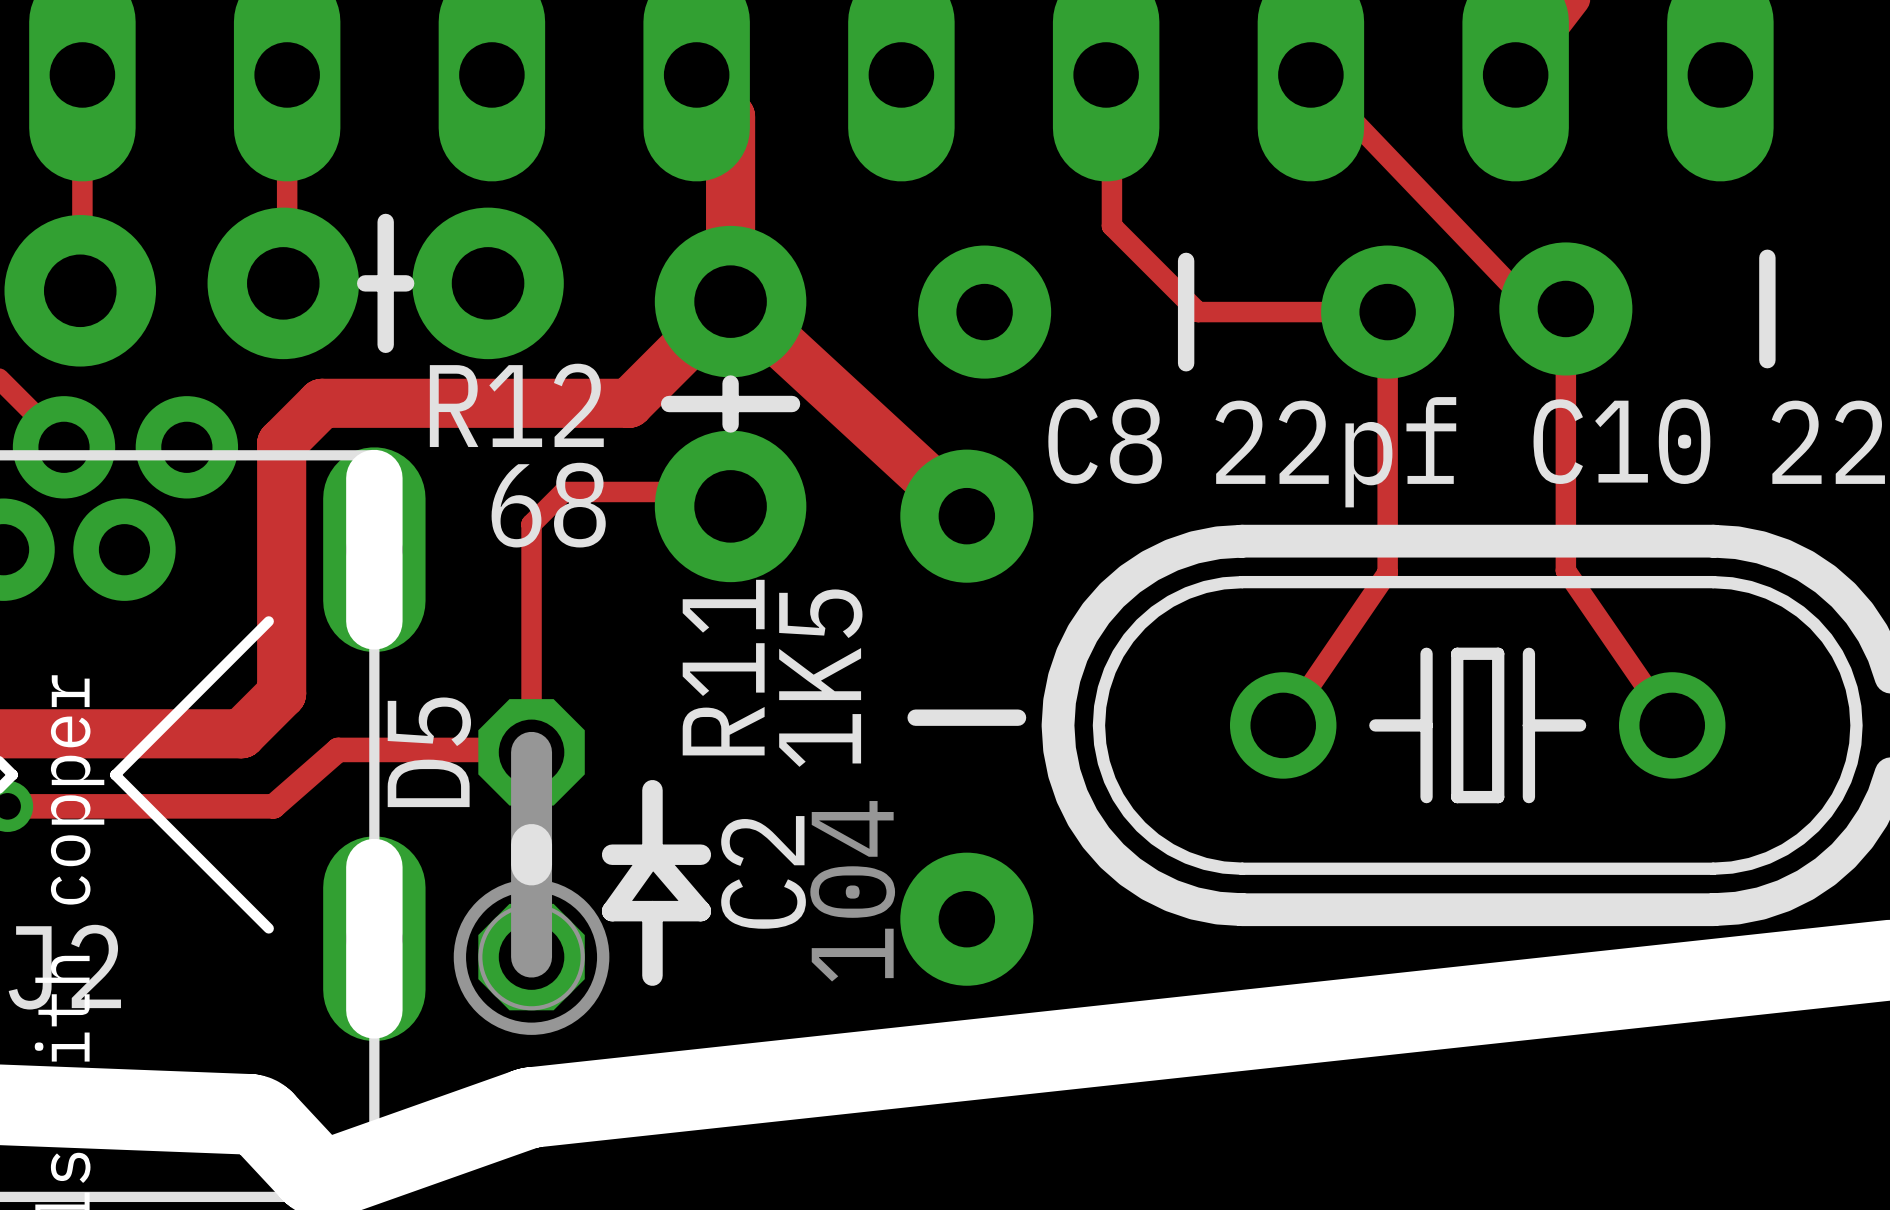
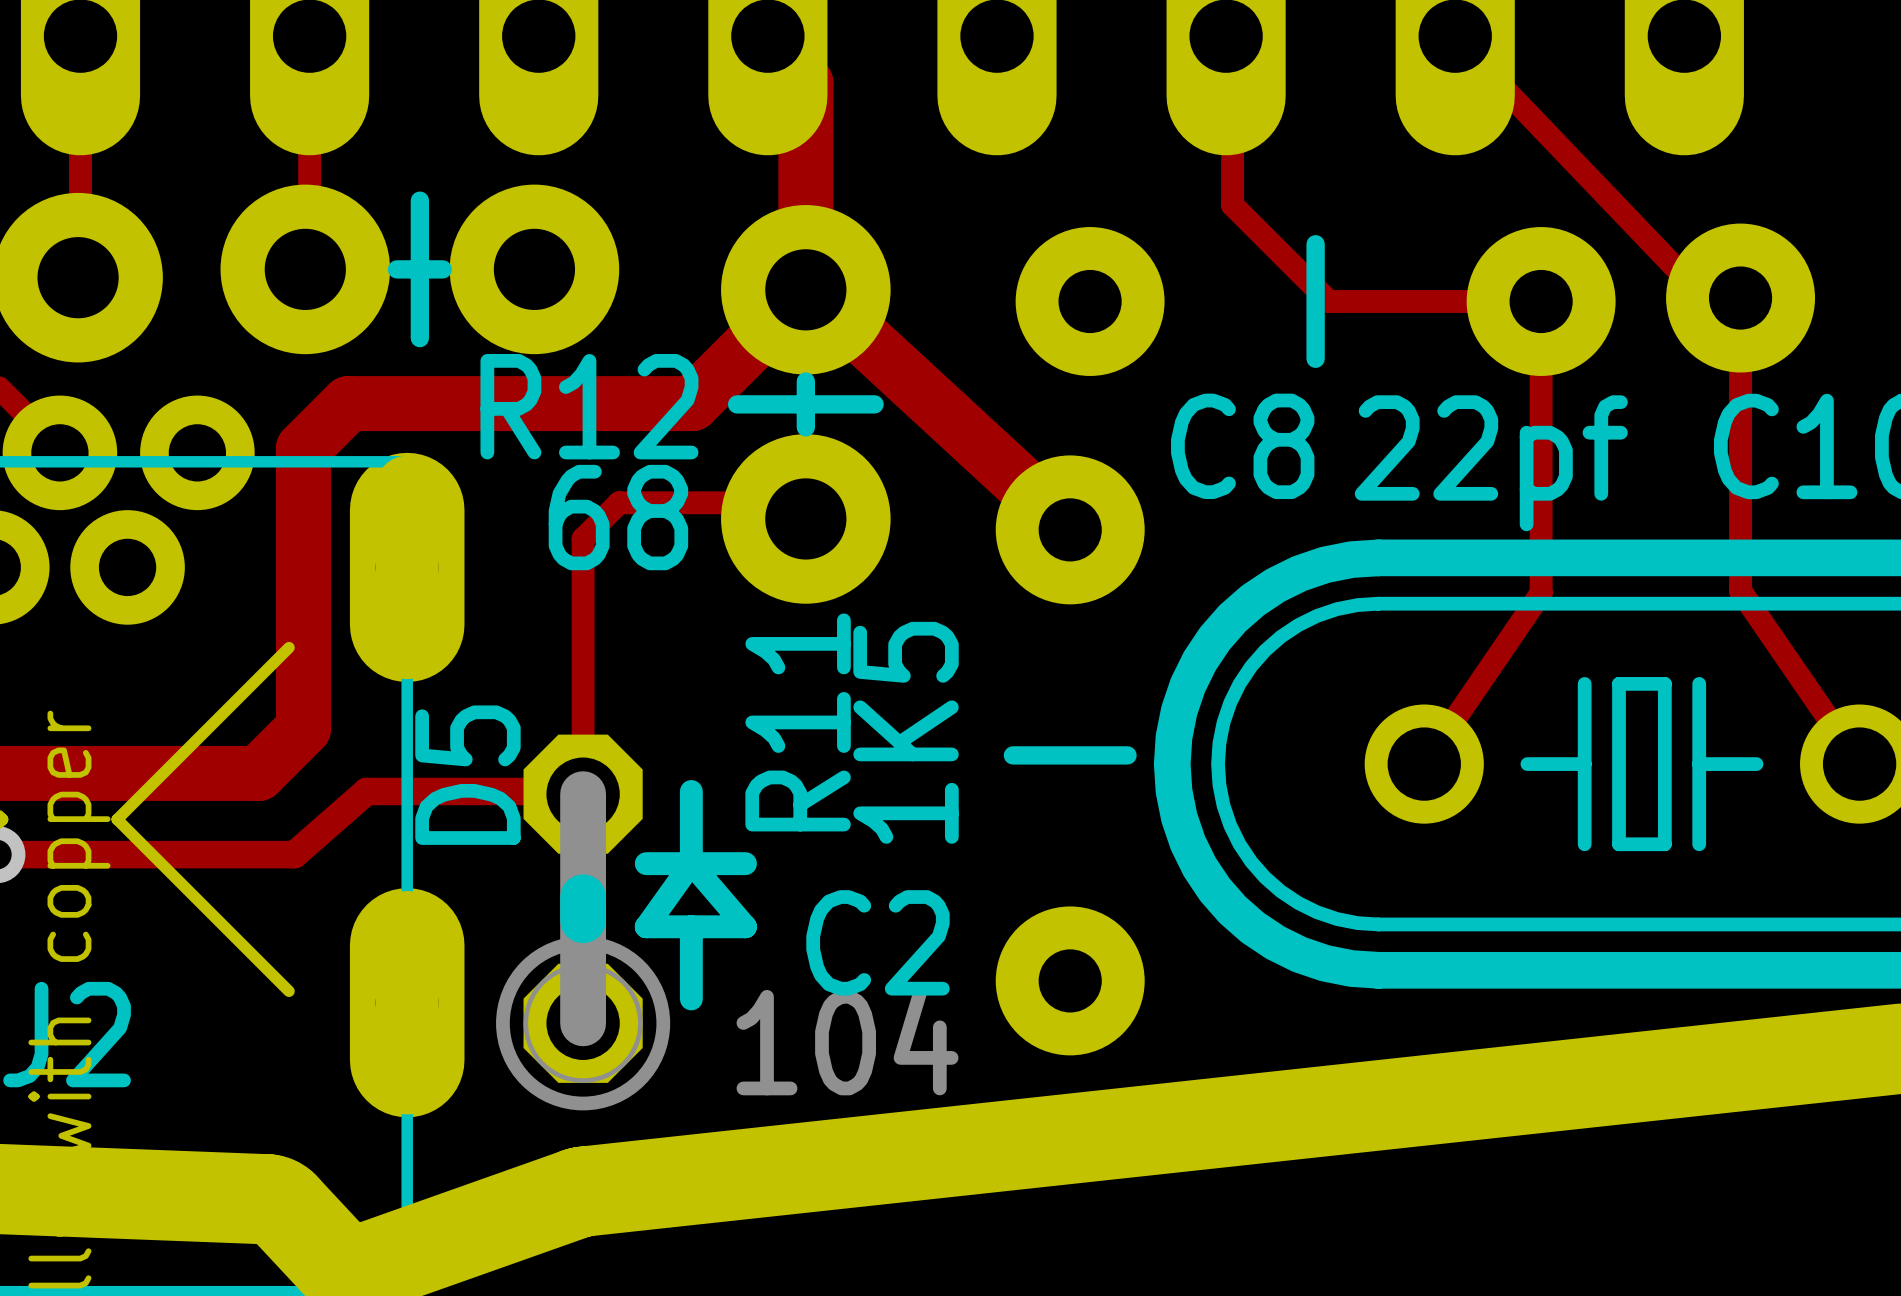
line: (652, 790) (652, 854) -> (691, 791) (691, 863)
line: (612, 854) (700, 854) -> (646, 863) (745, 863)
line: (652, 854) (612, 911) (700, 911) (652, 854) -> (691, 863) (646, 926) (745, 926) (691, 863)
C2 name rotation: 0° (763, 872) -> 90° clockwise (878, 942)
C2 value rotation: 0° (852, 891) -> 90° clockwise (847, 1040)
line: (652, 911) (652, 975) -> (691, 926) (691, 998)

